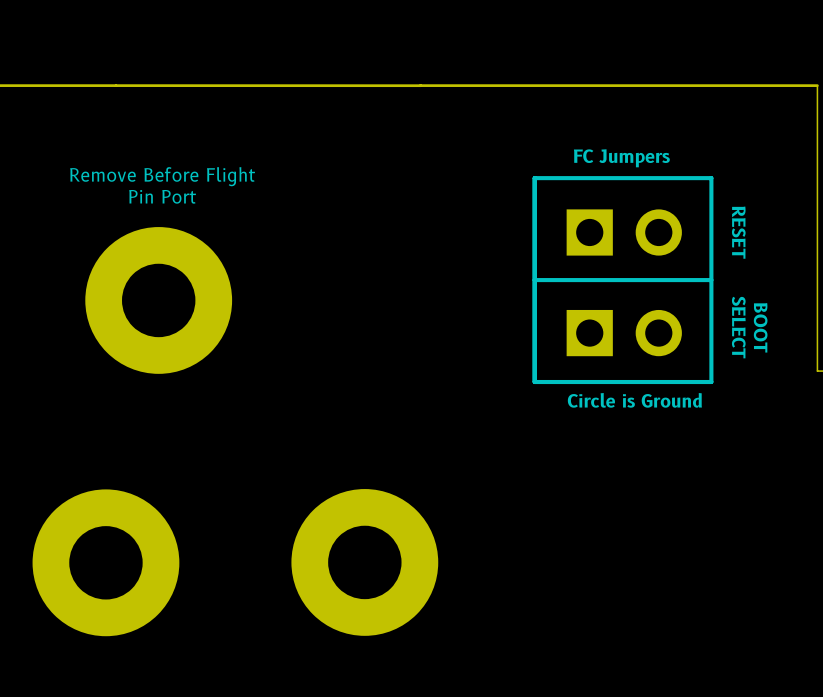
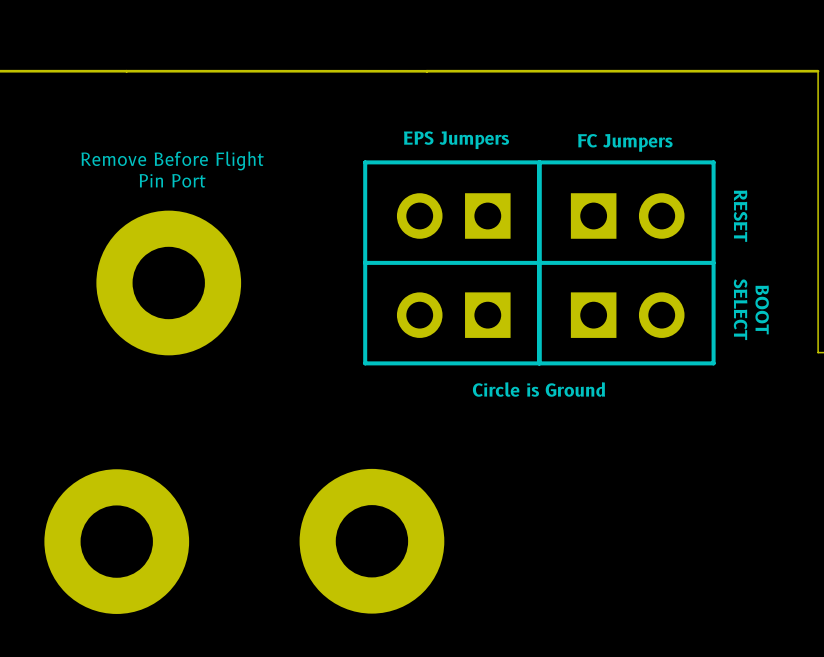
text: none -> EPS Jumpers (456, 140)
line: none -> (539, 162) (365, 162) (365, 363) (539, 363)
part: none -> (453, 215)
line: none -> (539, 262) (365, 262)
part: none -> (453, 315)
text position: Circle is Ground (634, 400) -> Circle is Ground (538, 389)

